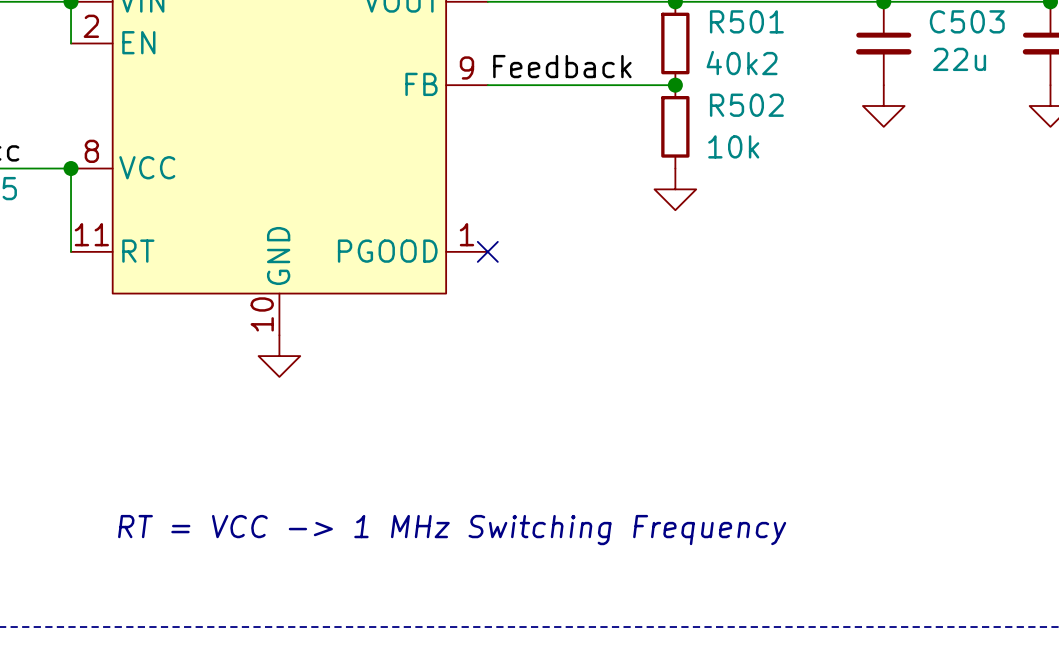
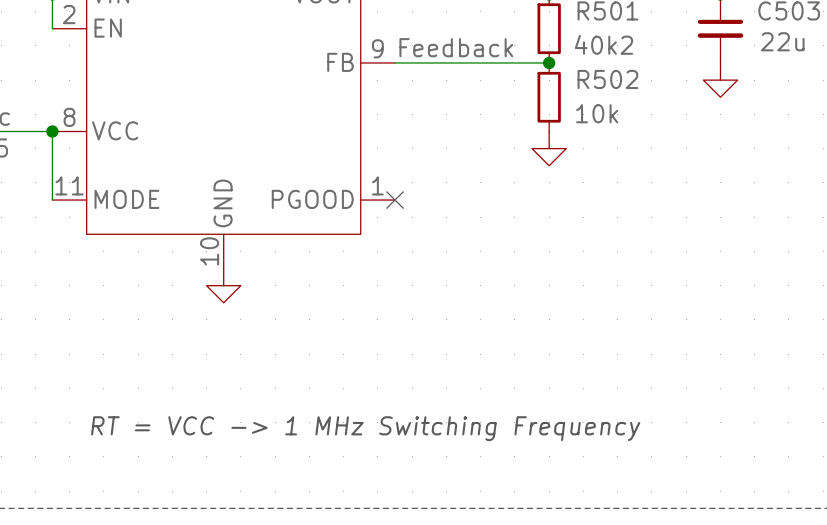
part pin name: RT (138, 251) -> MODE (126, 199)

